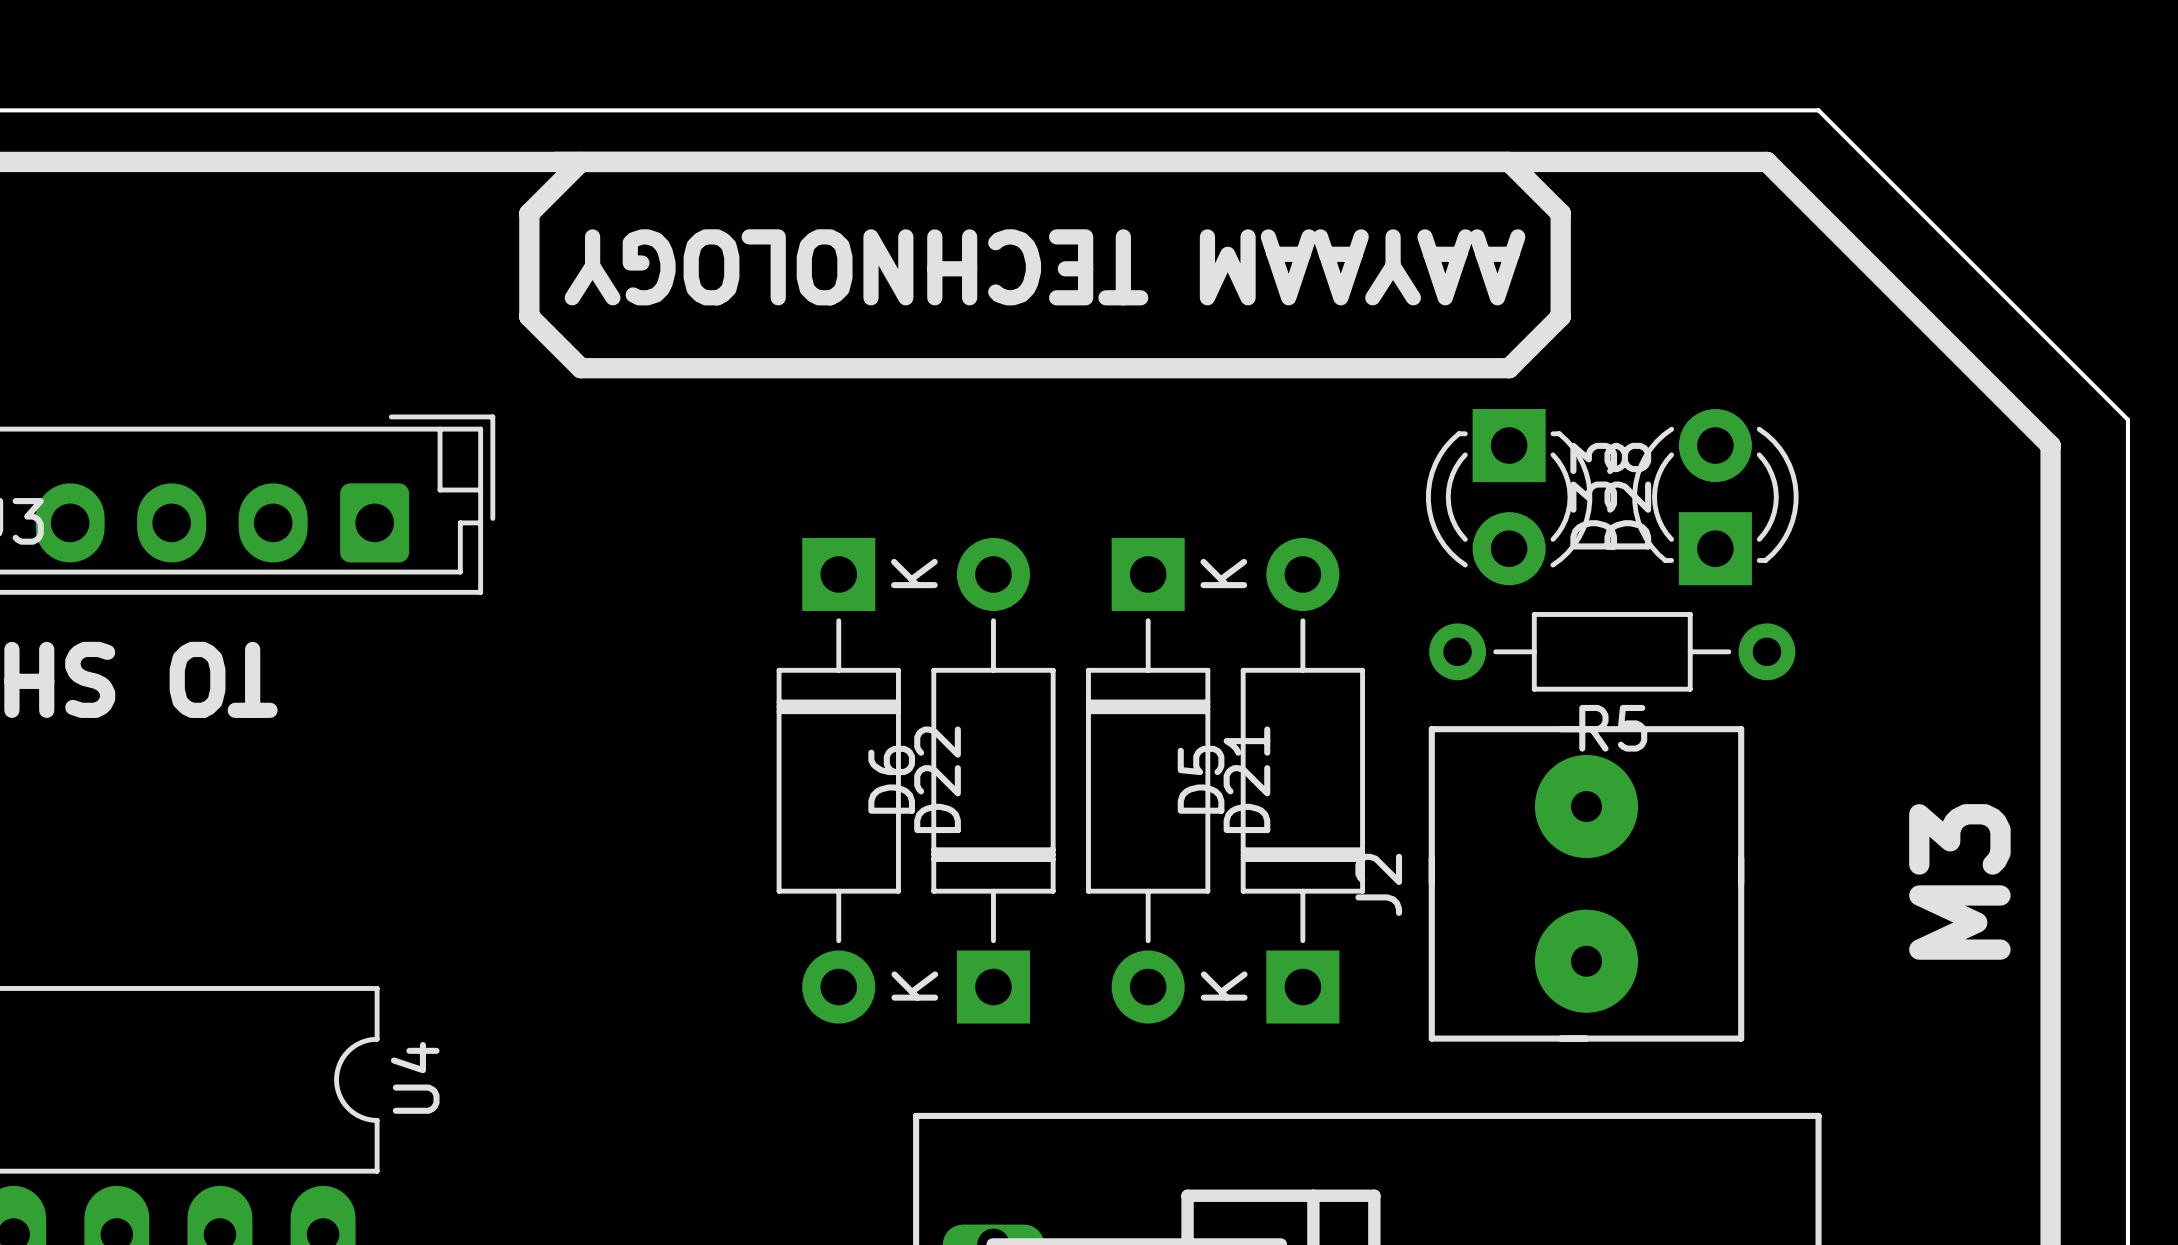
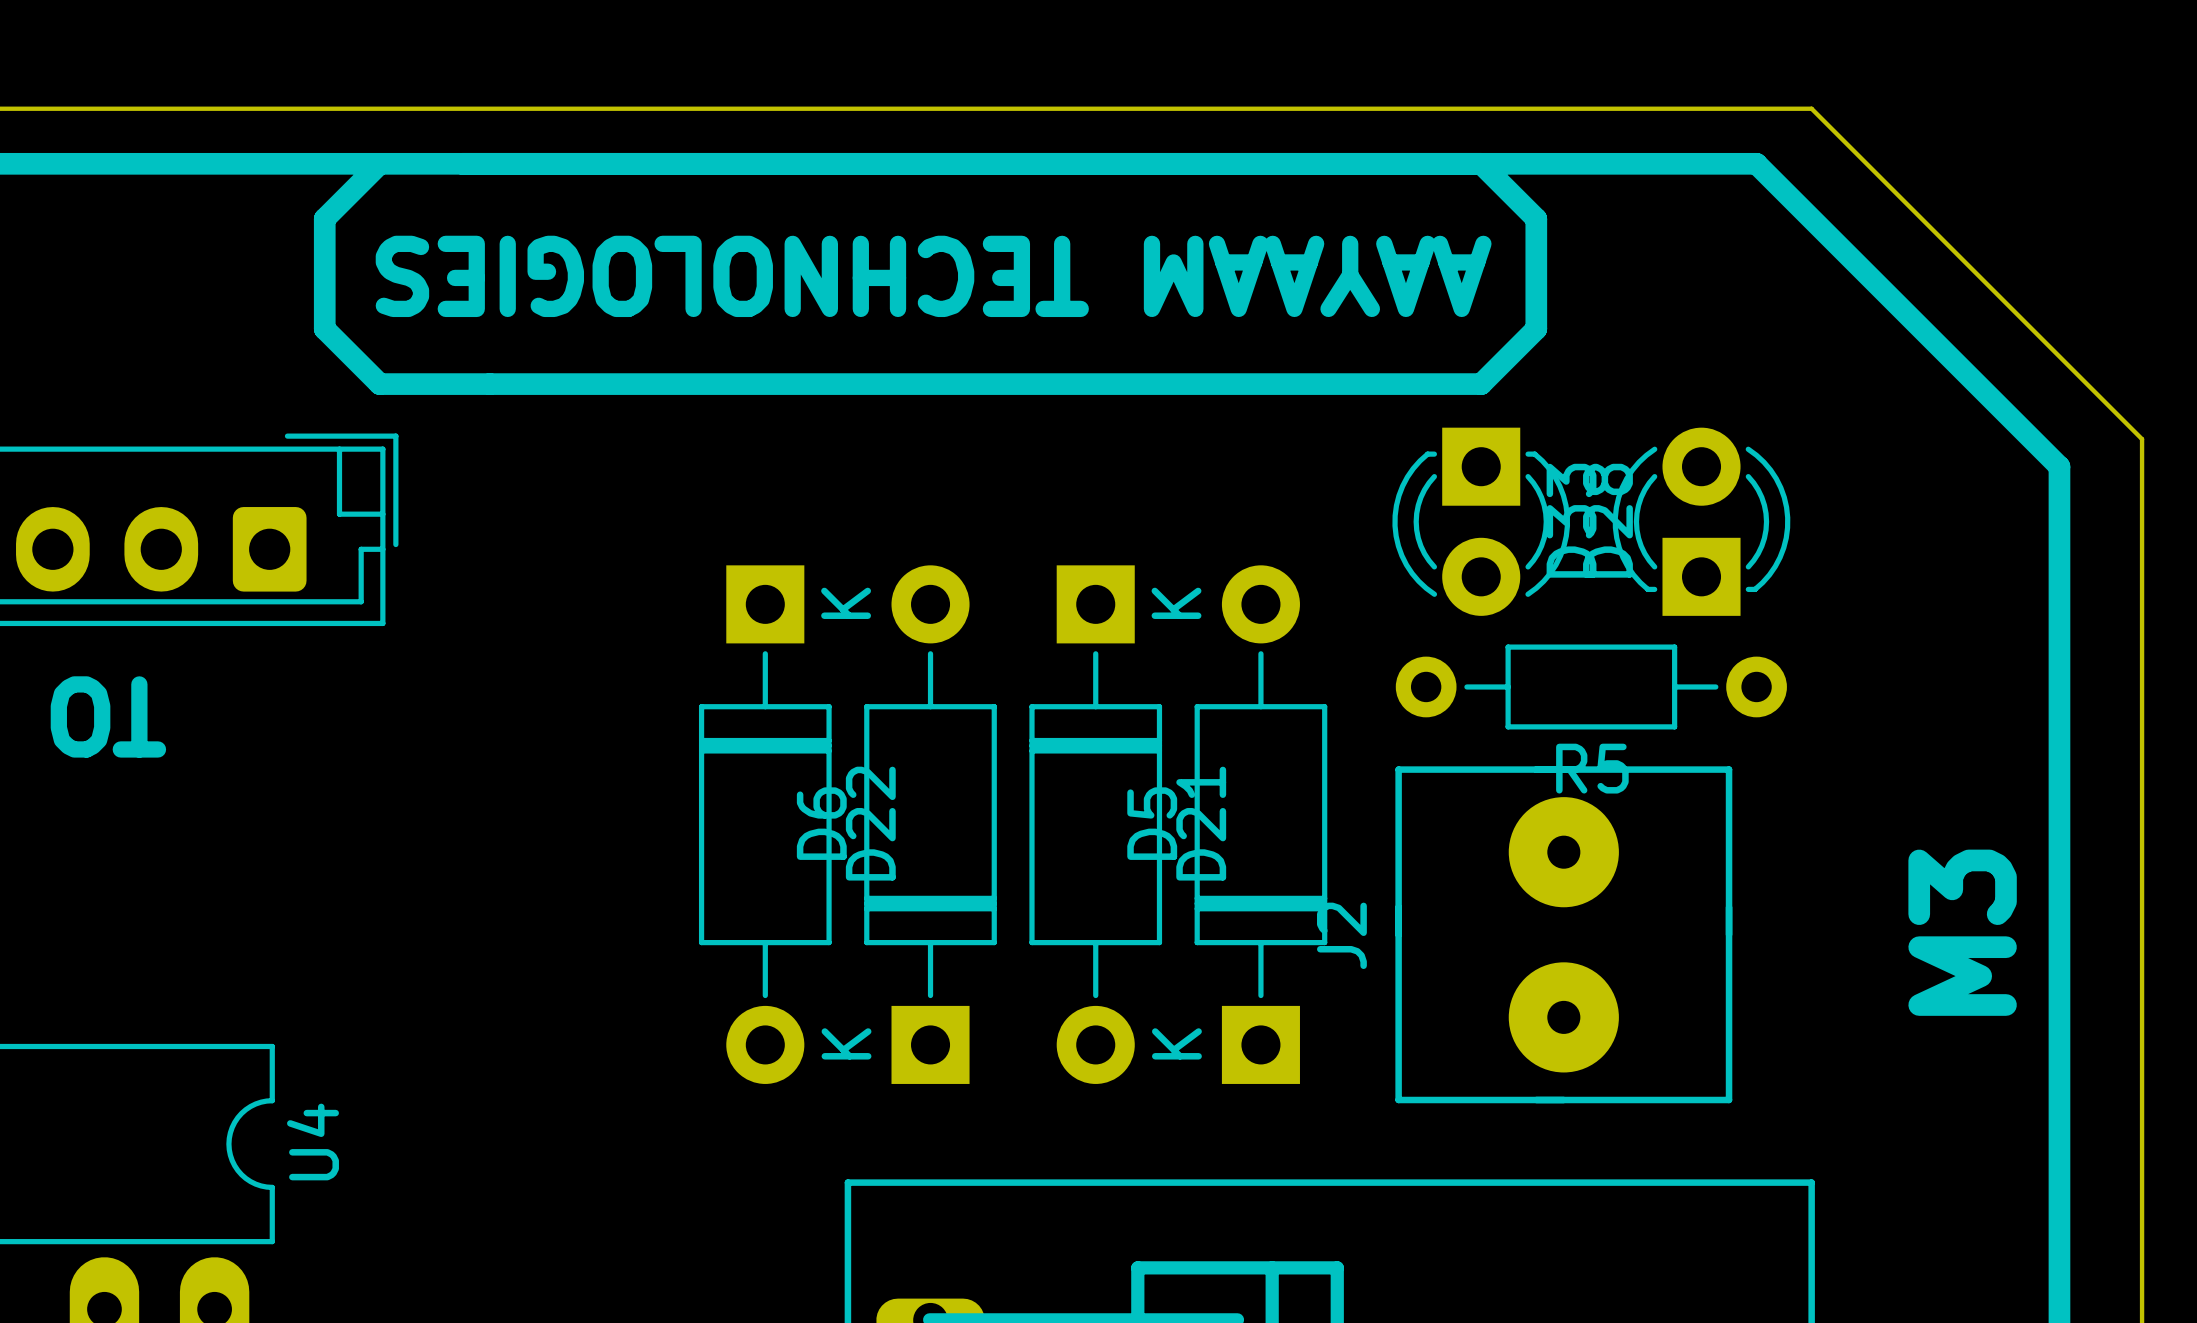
line: (580, 161) (529, 213) (529, 316) (580, 368) -> (379, 163) (324, 218) (324, 329) (379, 384) (489, 384)
text: AAYAAM TECHNOLOGY (1045, 267) -> AAYAAM TECHNOLOGIES (933, 276)

